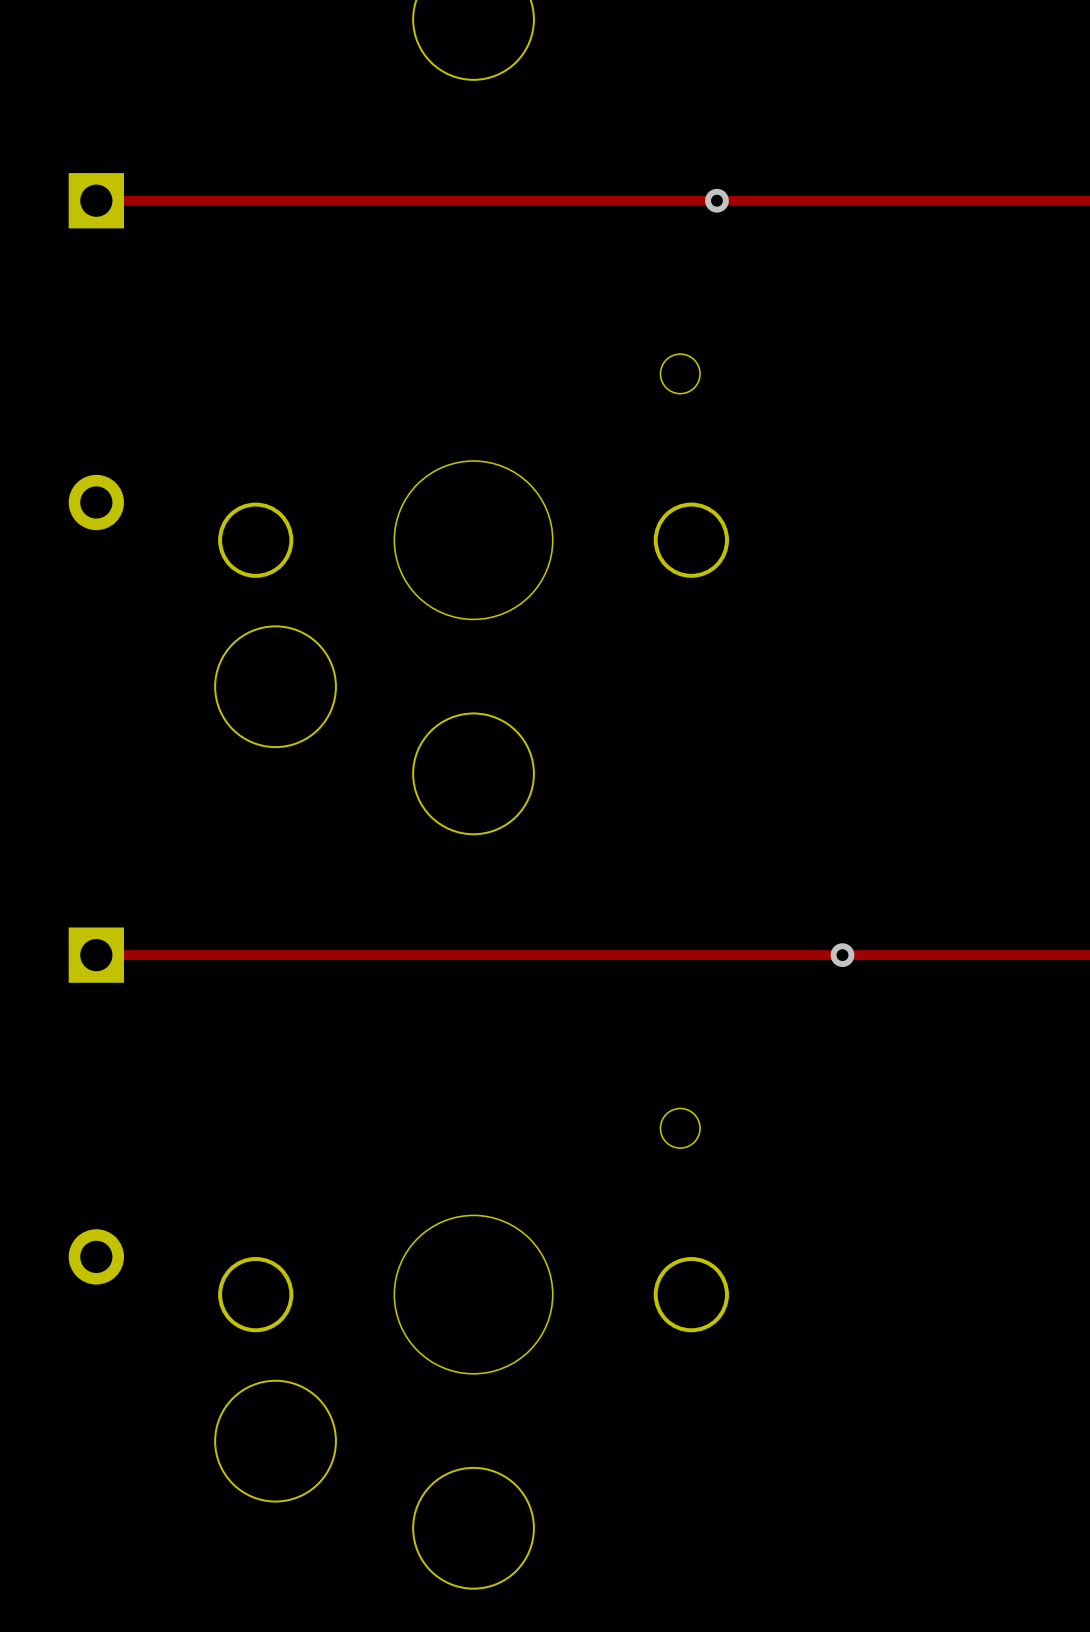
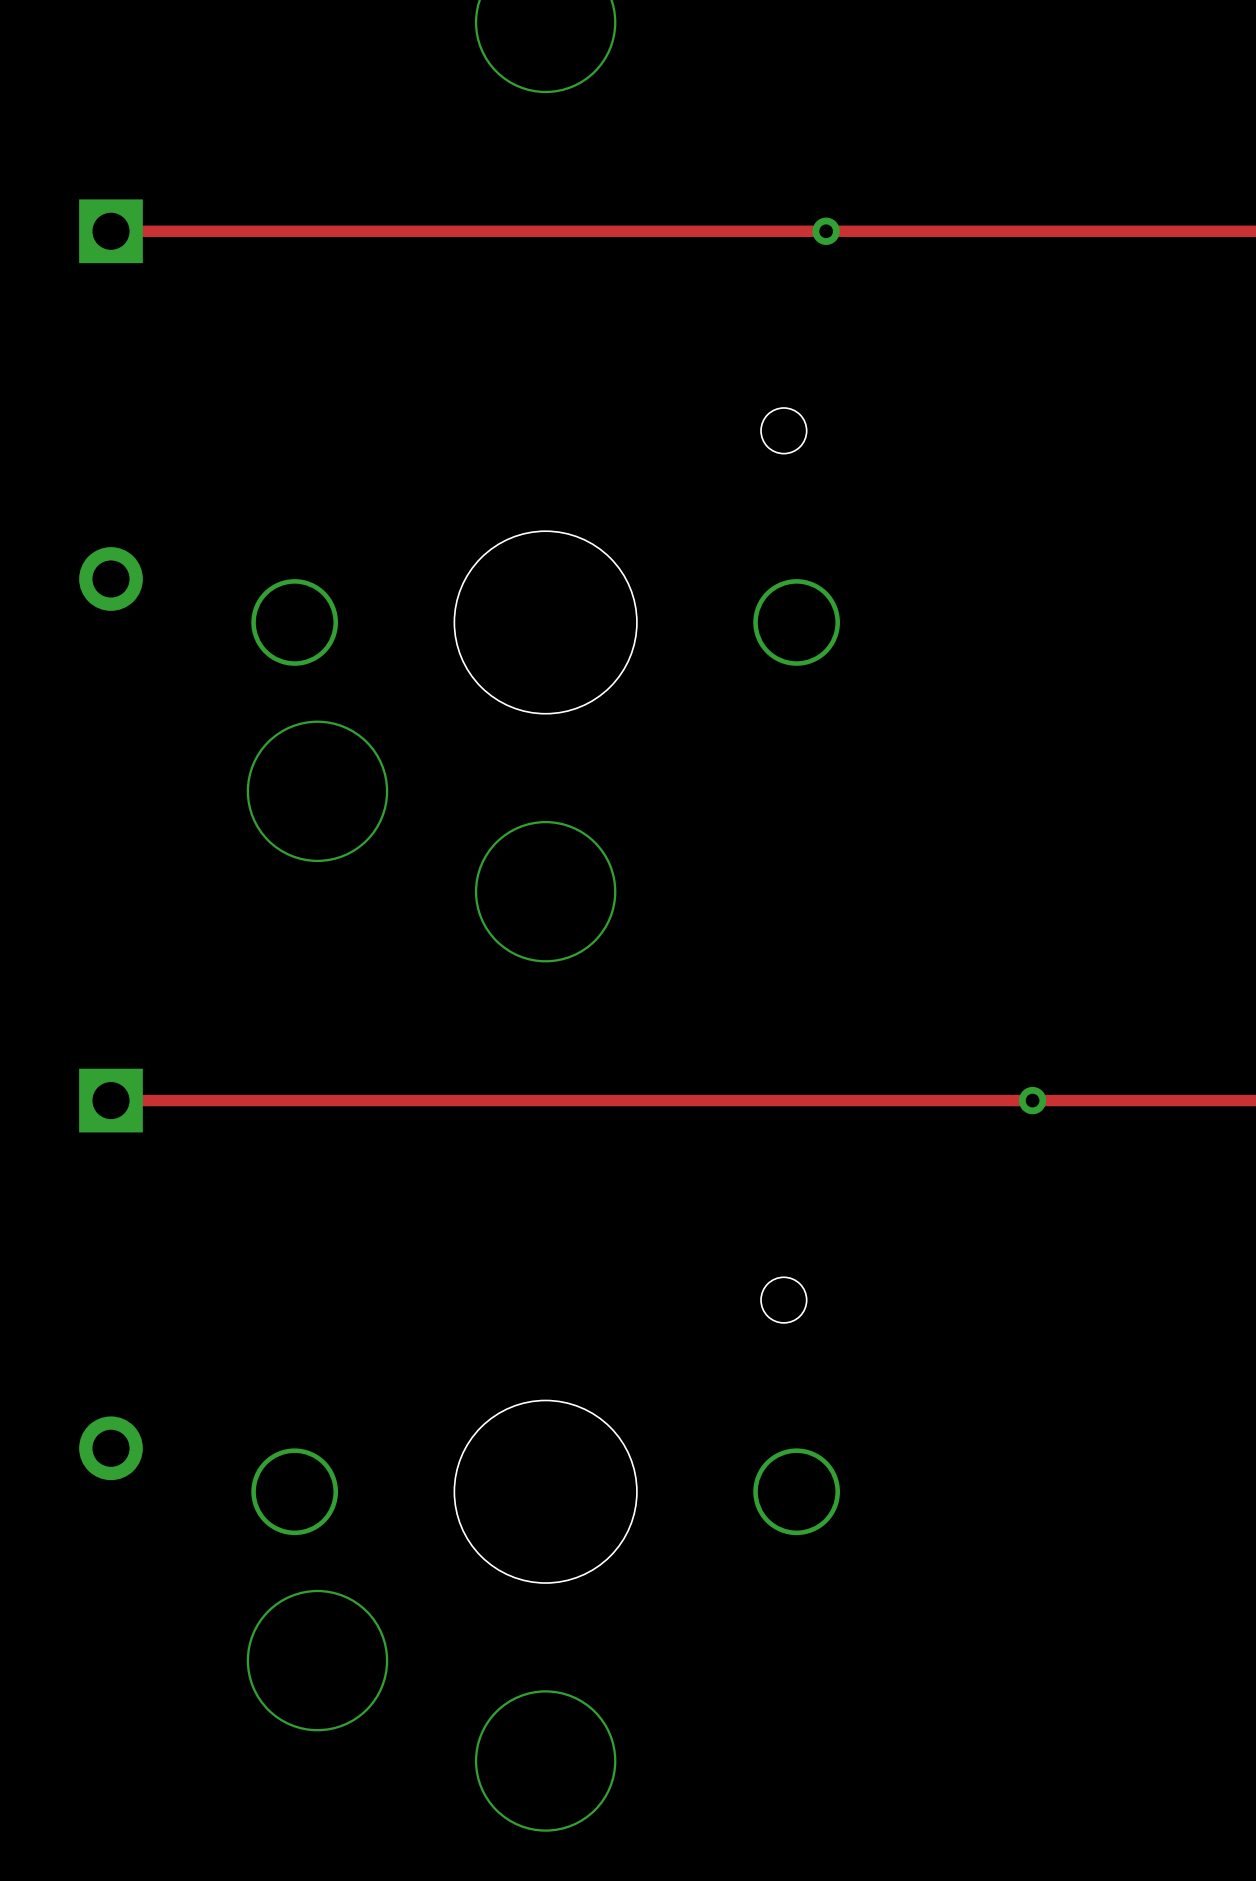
via position: (842, 955) -> (1032, 1100)

